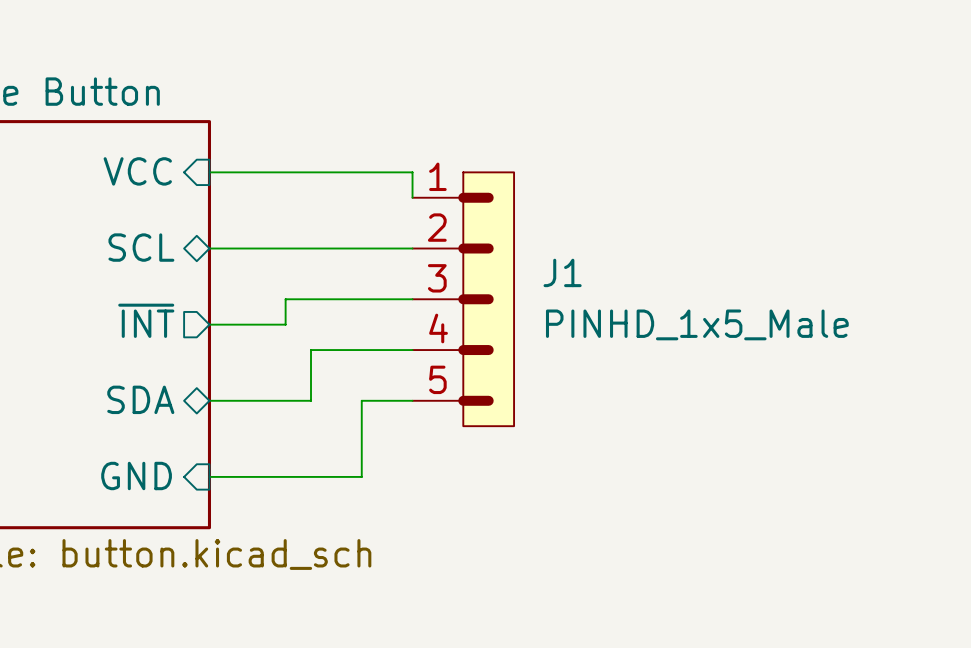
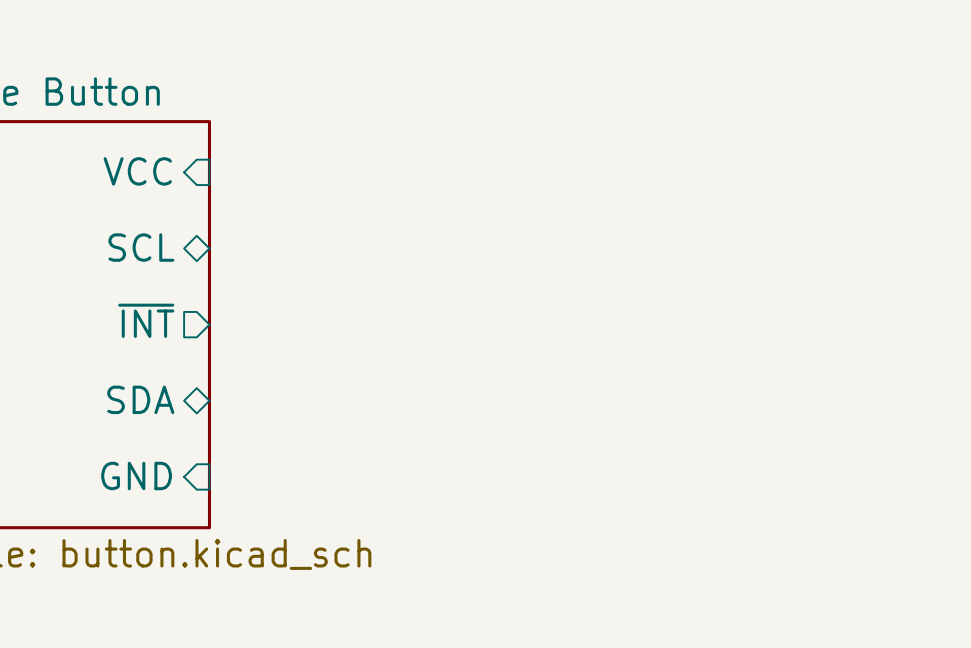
wire: (209, 172) (412, 172) (412, 197) -> none
wire: (209, 248) (412, 248) -> none
wire: (412, 299) (285, 299) (285, 324) (209, 324) -> none
J1: PINHD_1x5_Male (463, 299) -> none
wire: (412, 350) (311, 350) (311, 400) (209, 400) -> none
wire: (412, 400) (361, 400) (361, 476) (209, 476) -> none

